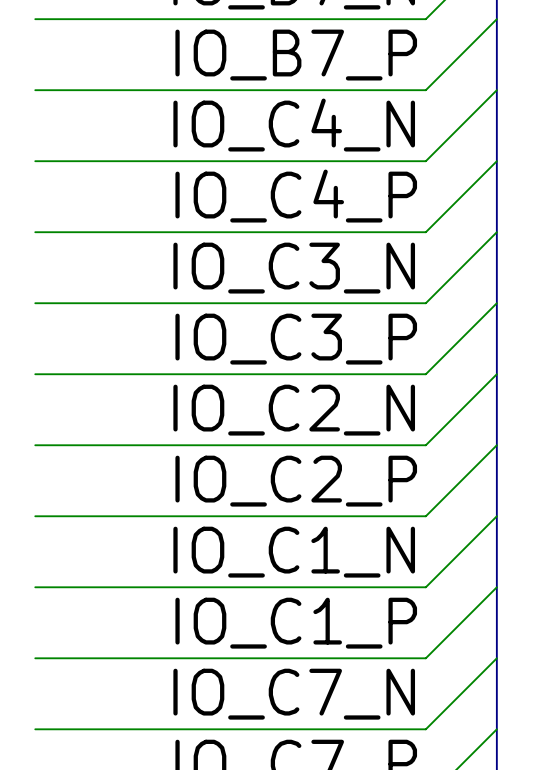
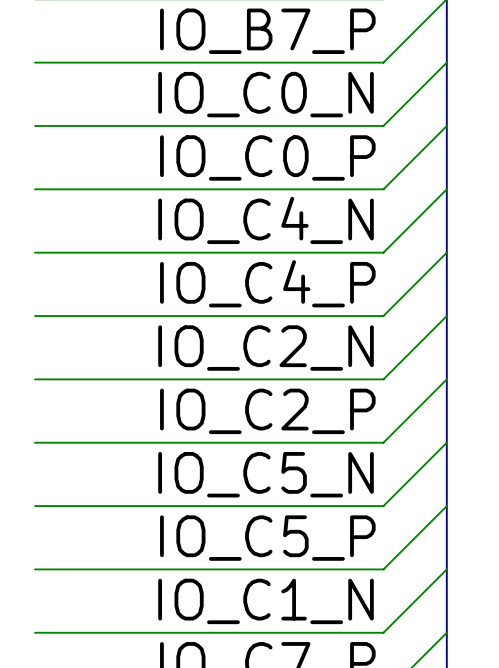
label: IO_C4_N (294, 125) -> IO_C0_N (266, 94)
label: IO_C4_P (296, 196) -> IO_C0_P (267, 157)
label: IO_C3_N (294, 268) -> IO_C4_N (266, 220)
label: IO_C3_P (296, 339) -> IO_C4_P (267, 283)
label: IO_C1_N (294, 552) -> IO_C5_N (266, 474)
label: IO_C1_P (296, 623) -> IO_C5_P (267, 538)
label: IO_C7_N (294, 694) -> IO_C1_N (266, 601)

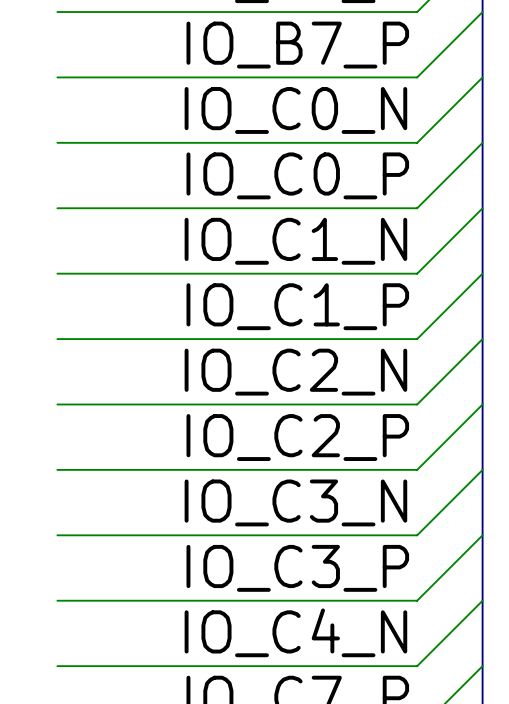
label: IO_C4_N (266, 220) -> IO_C1_N (295, 241)
label: IO_C4_P (267, 283) -> IO_C1_P (297, 306)
label: IO_C5_N (266, 474) -> IO_C3_N (295, 502)
label: IO_C5_P (267, 538) -> IO_C3_P (297, 568)
label: IO_C1_N (266, 601) -> IO_C4_N (295, 632)

